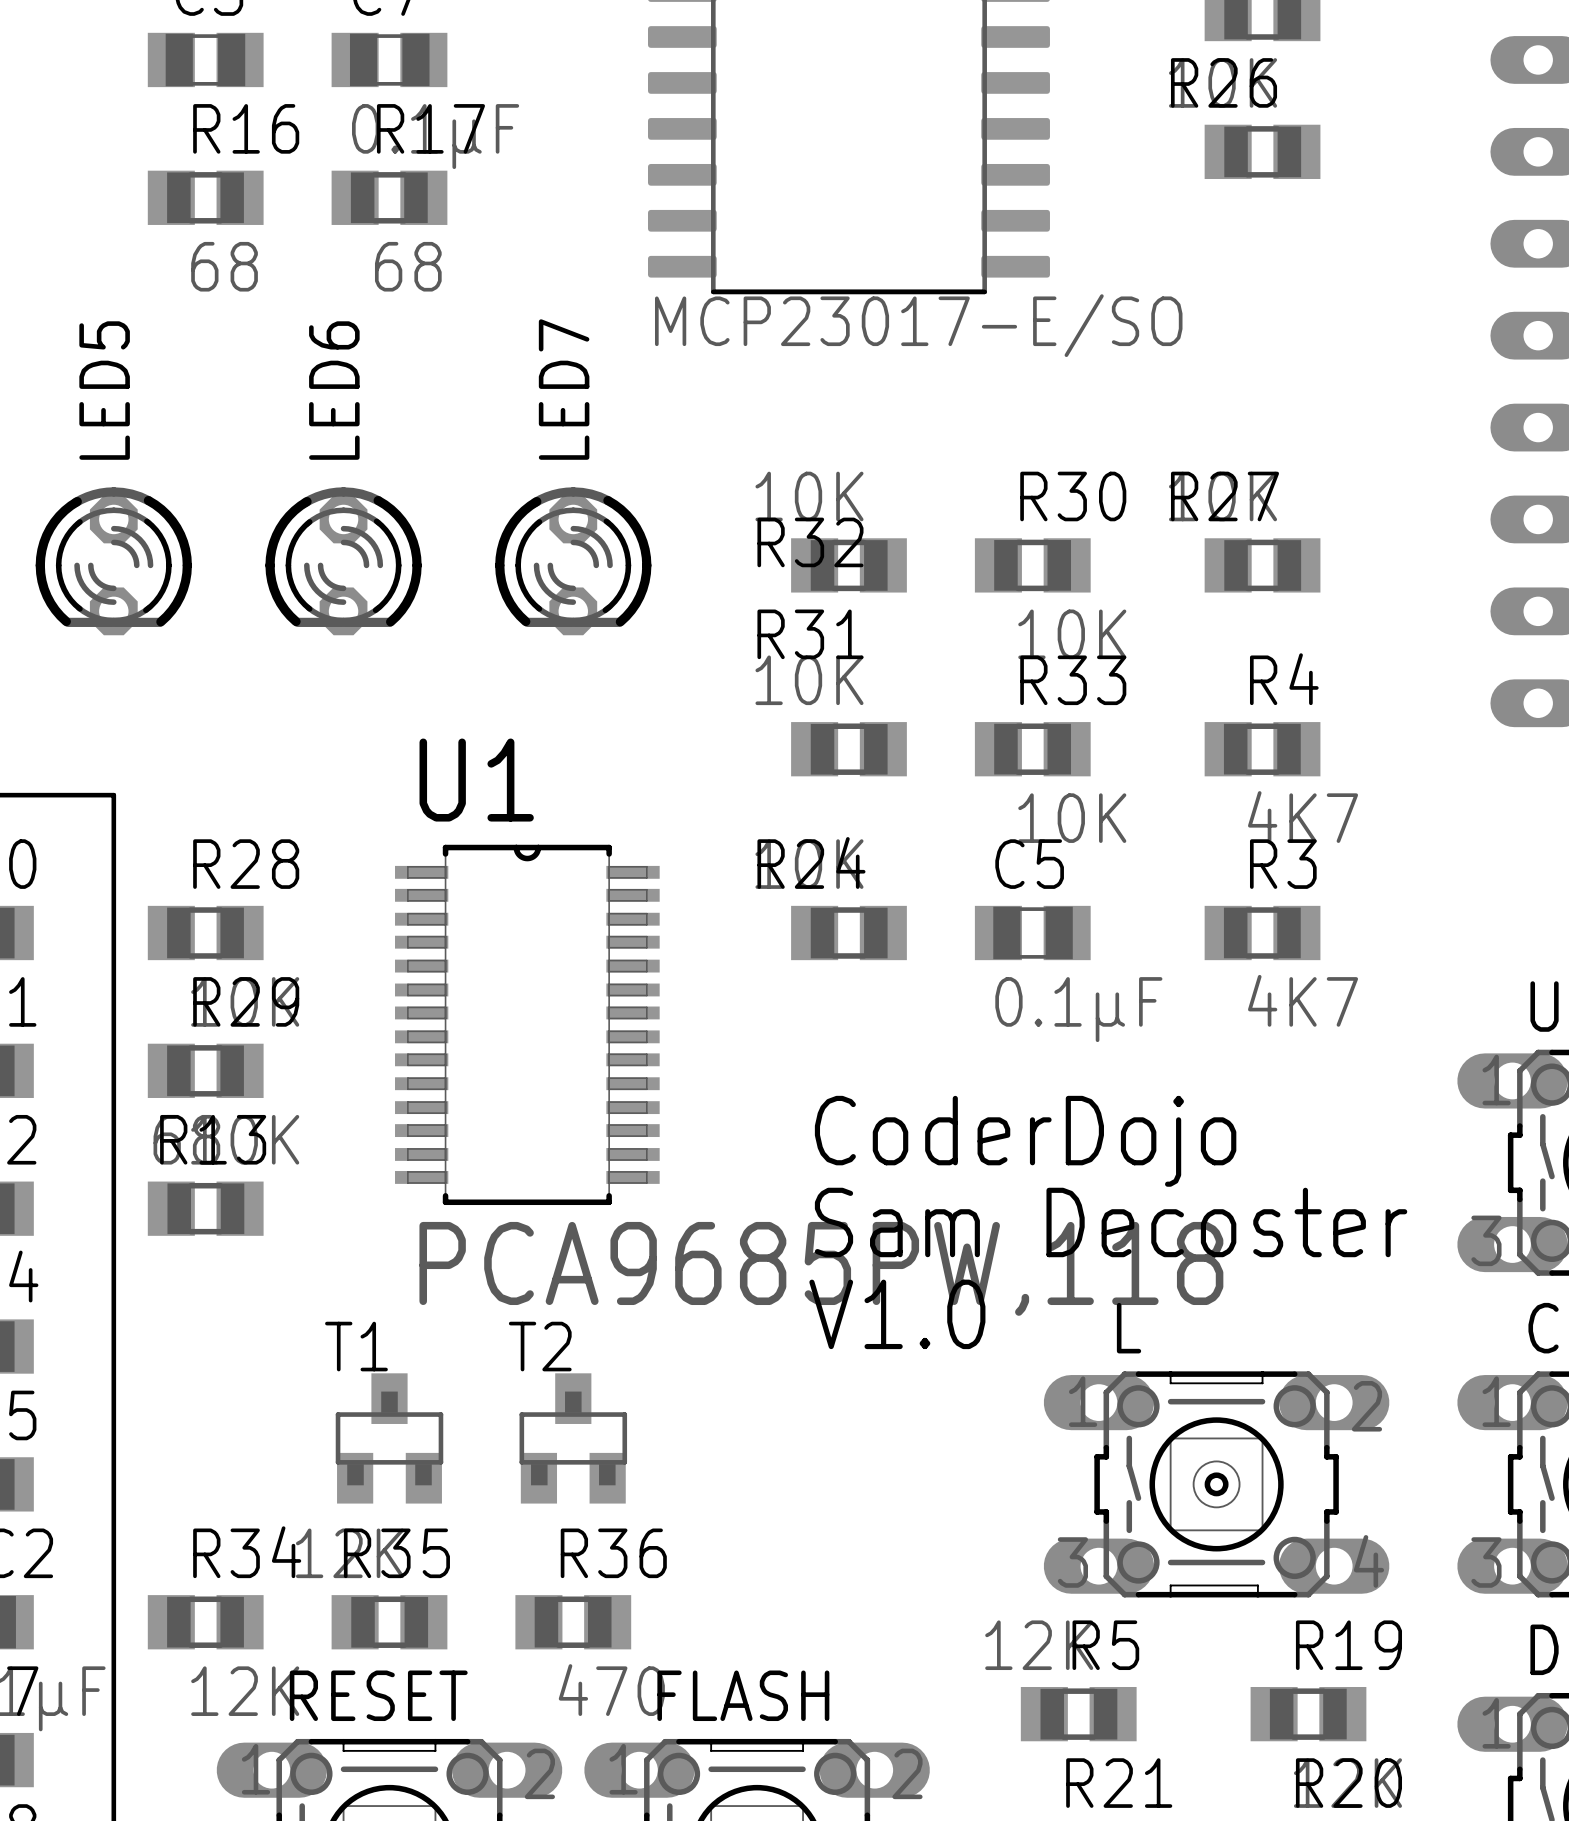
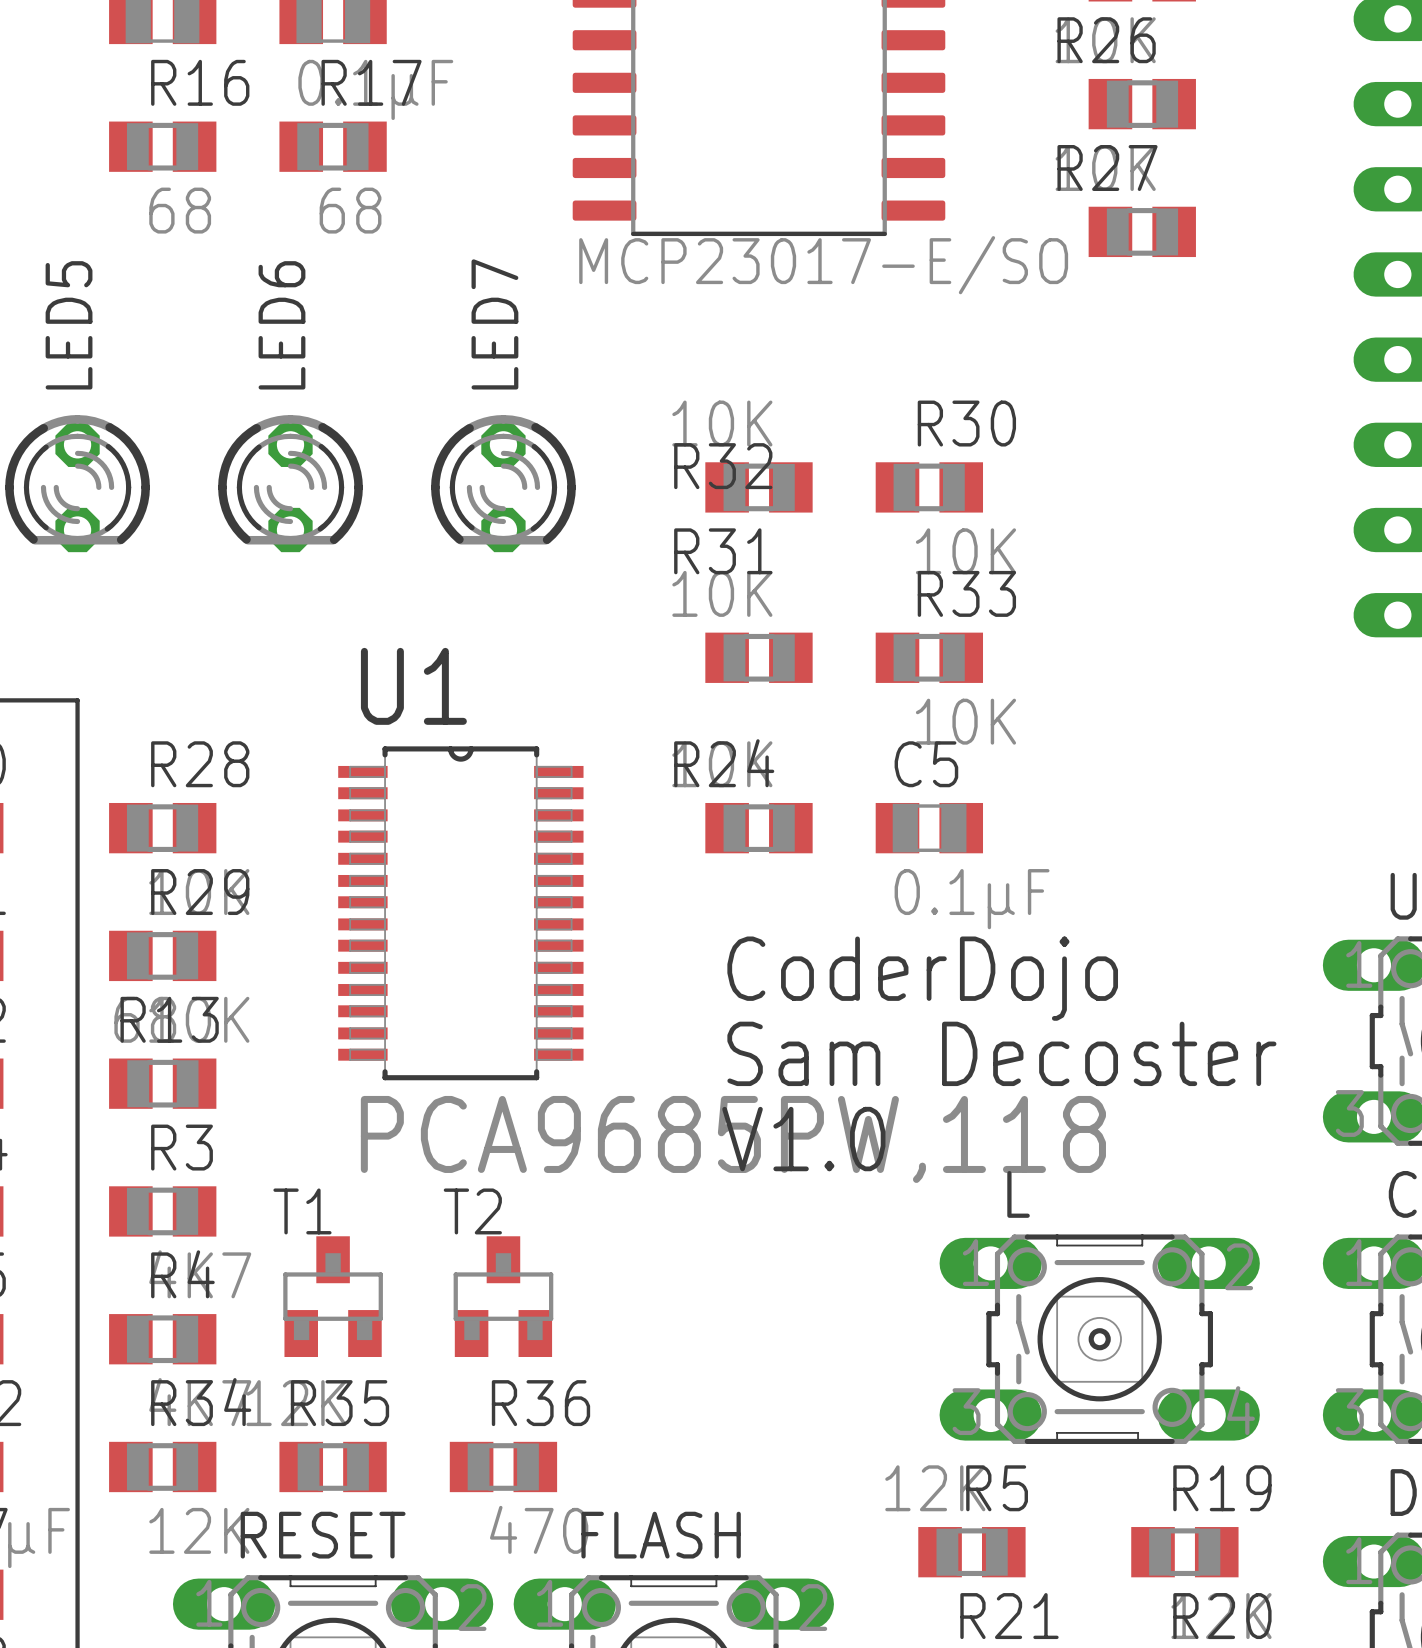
R27 position: (1262, 565) -> (1142, 231)
R4 position: (1262, 749) -> (162, 1339)
R3 position: (1262, 933) -> (162, 1211)
text position: CoderDojo (1025, 1141) -> CoderDojo (922, 978)
text position: Sam Decoster (1111, 1222) -> Sam Decoster (1001, 1053)
text position: V1.0 (897, 1314) -> V1.0 (803, 1139)

